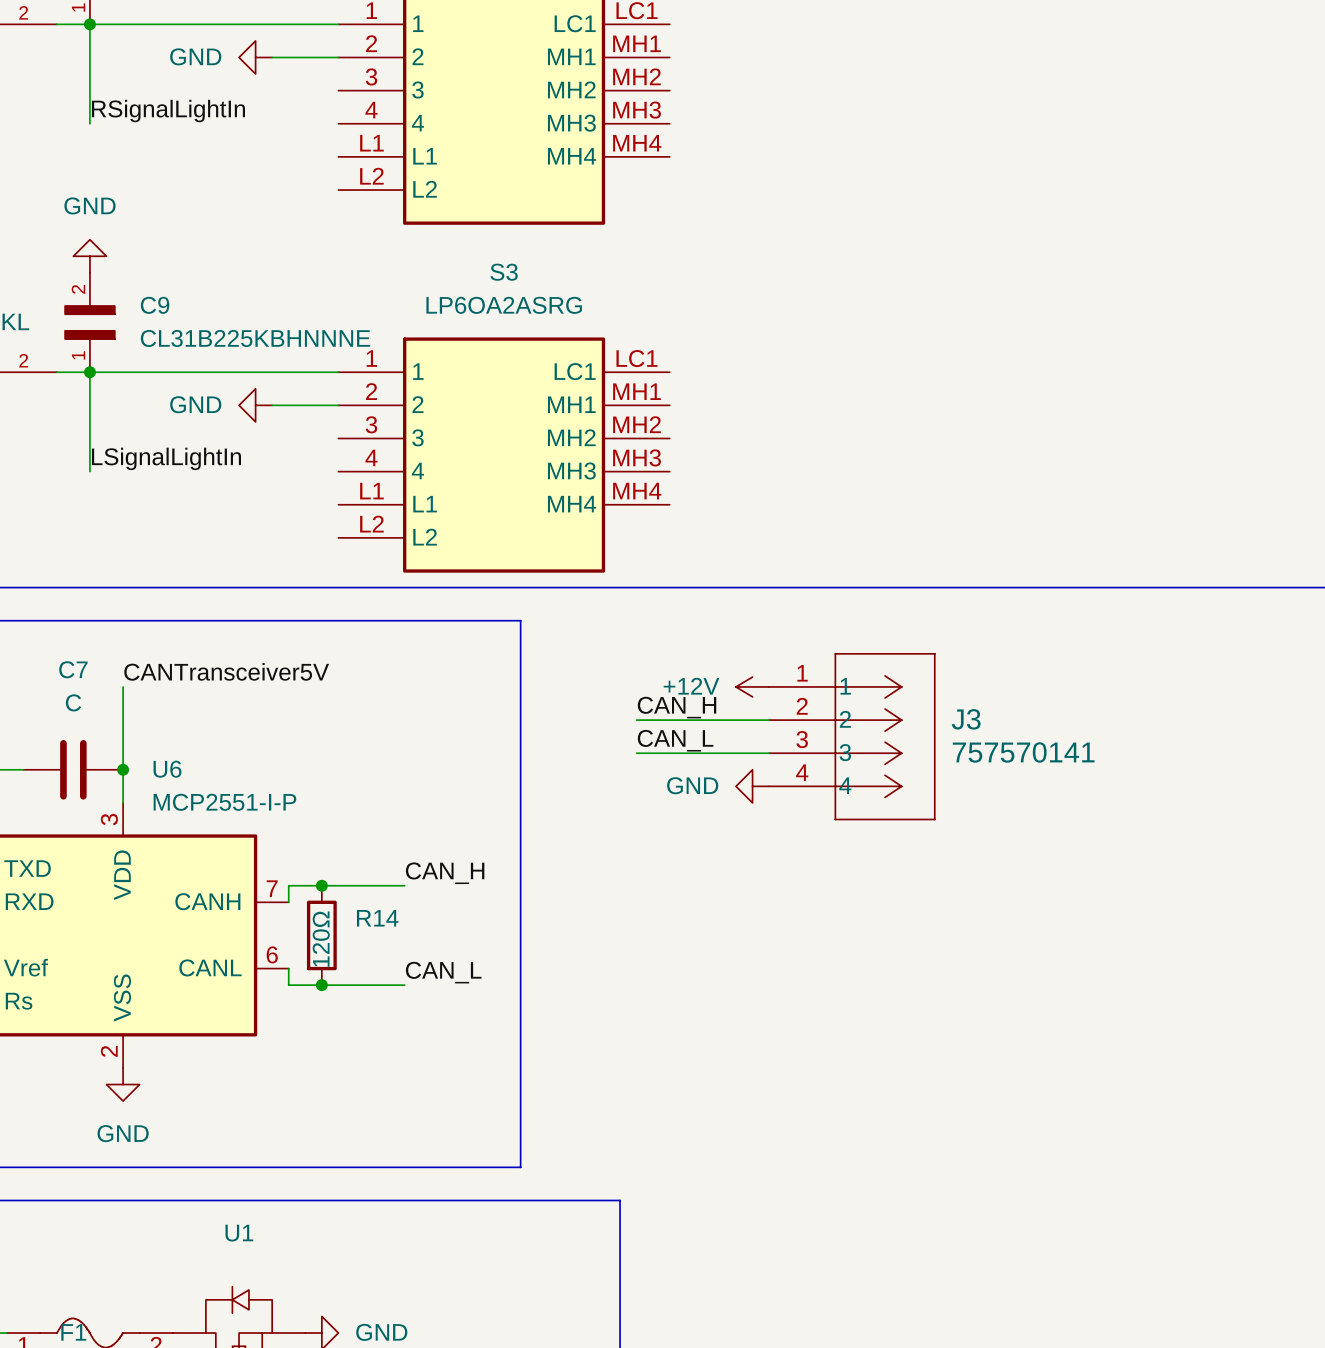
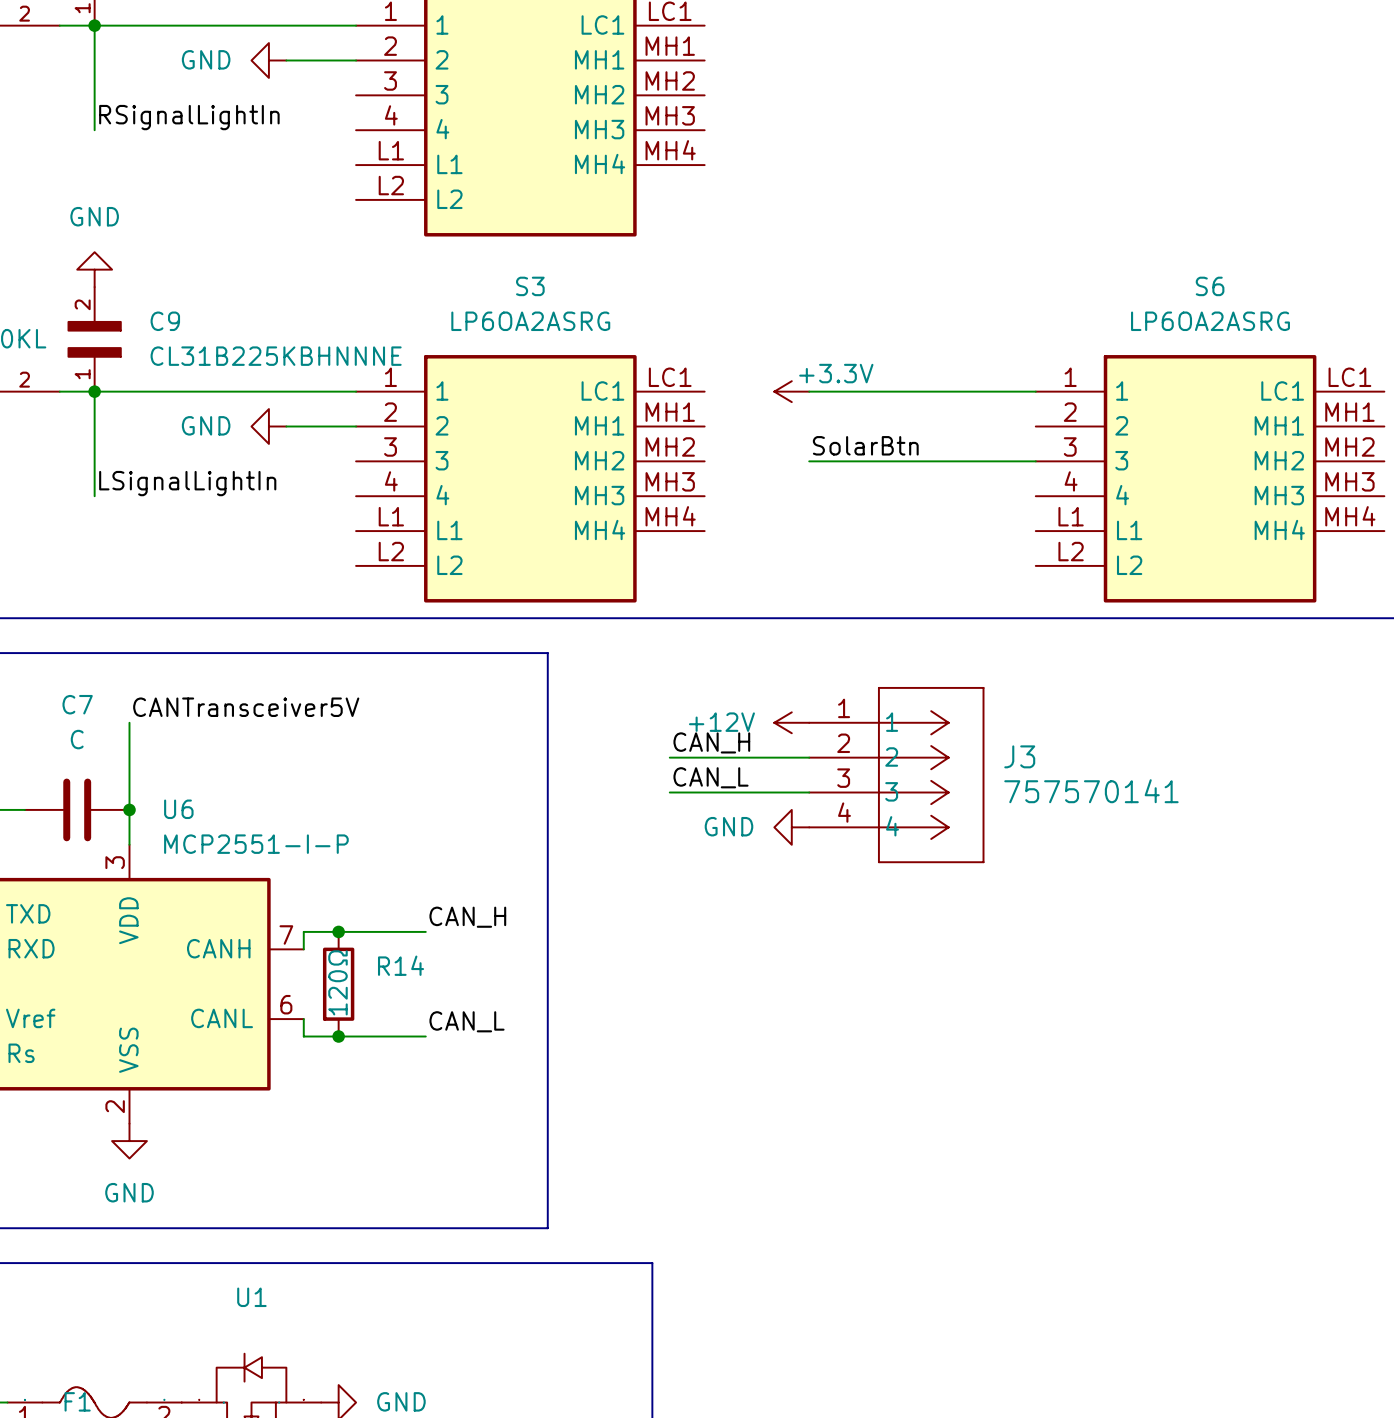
power symbol: none -> +3.3V (791, 391)
wire: none -> (809, 391) (1035, 391)
label: none -> SolarBtn (865, 445)
wire: none -> (809, 461) (1035, 461)
S6: none -> LP6OA2ASRG (1210, 478)

